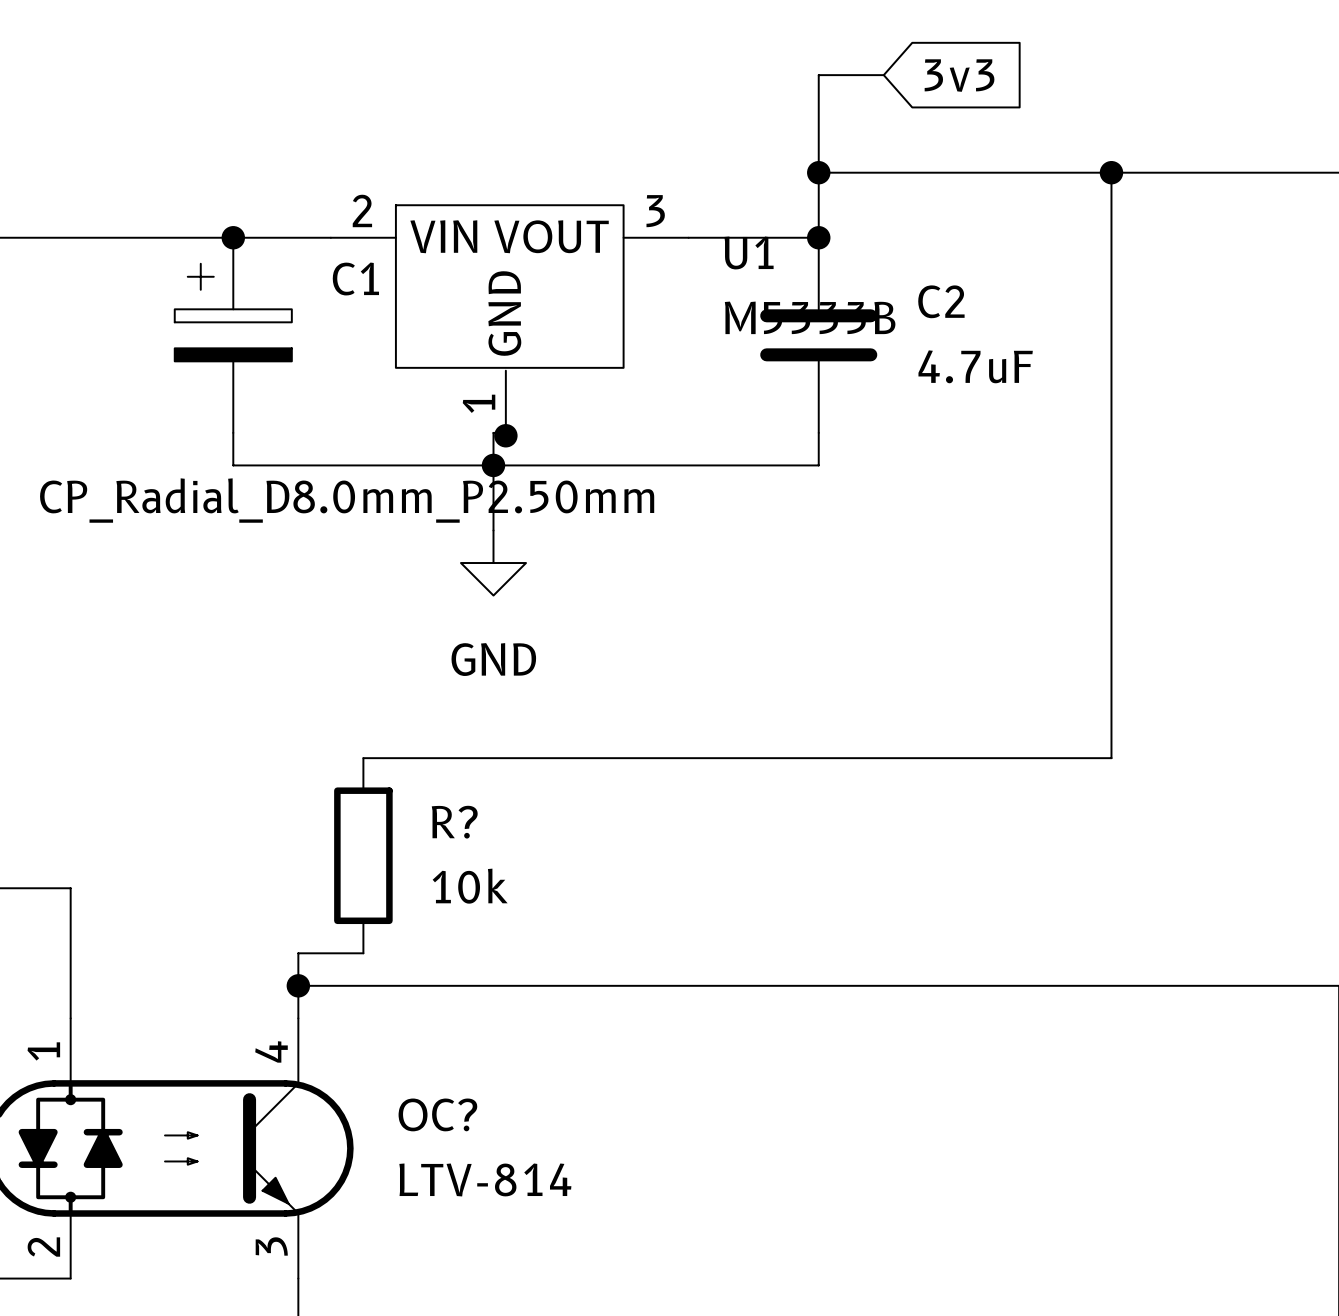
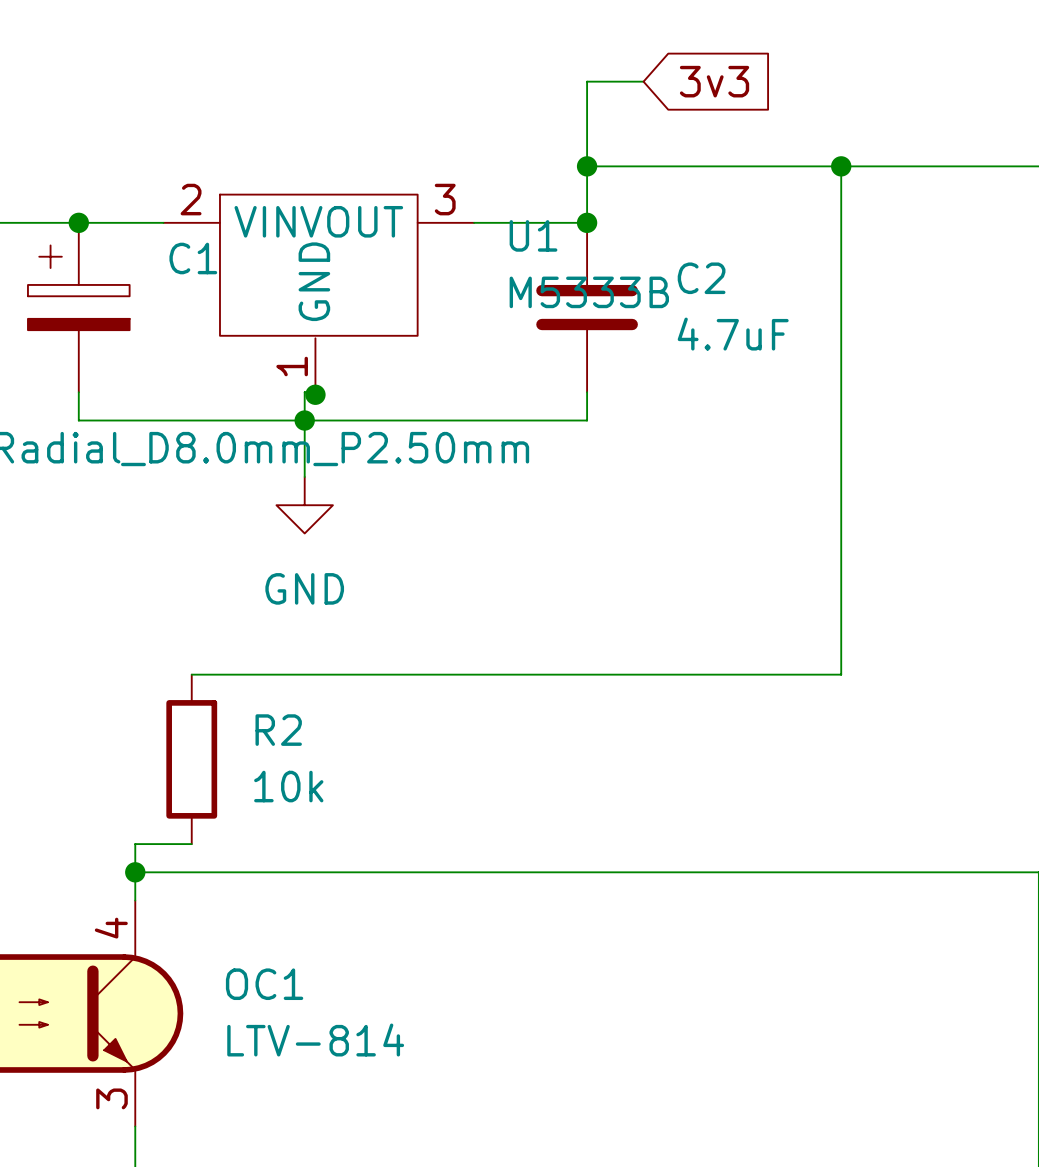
R? name: R? (454, 822) -> R2 (278, 730)
OC? name: OC? (437, 1114) -> OC1 (264, 984)

